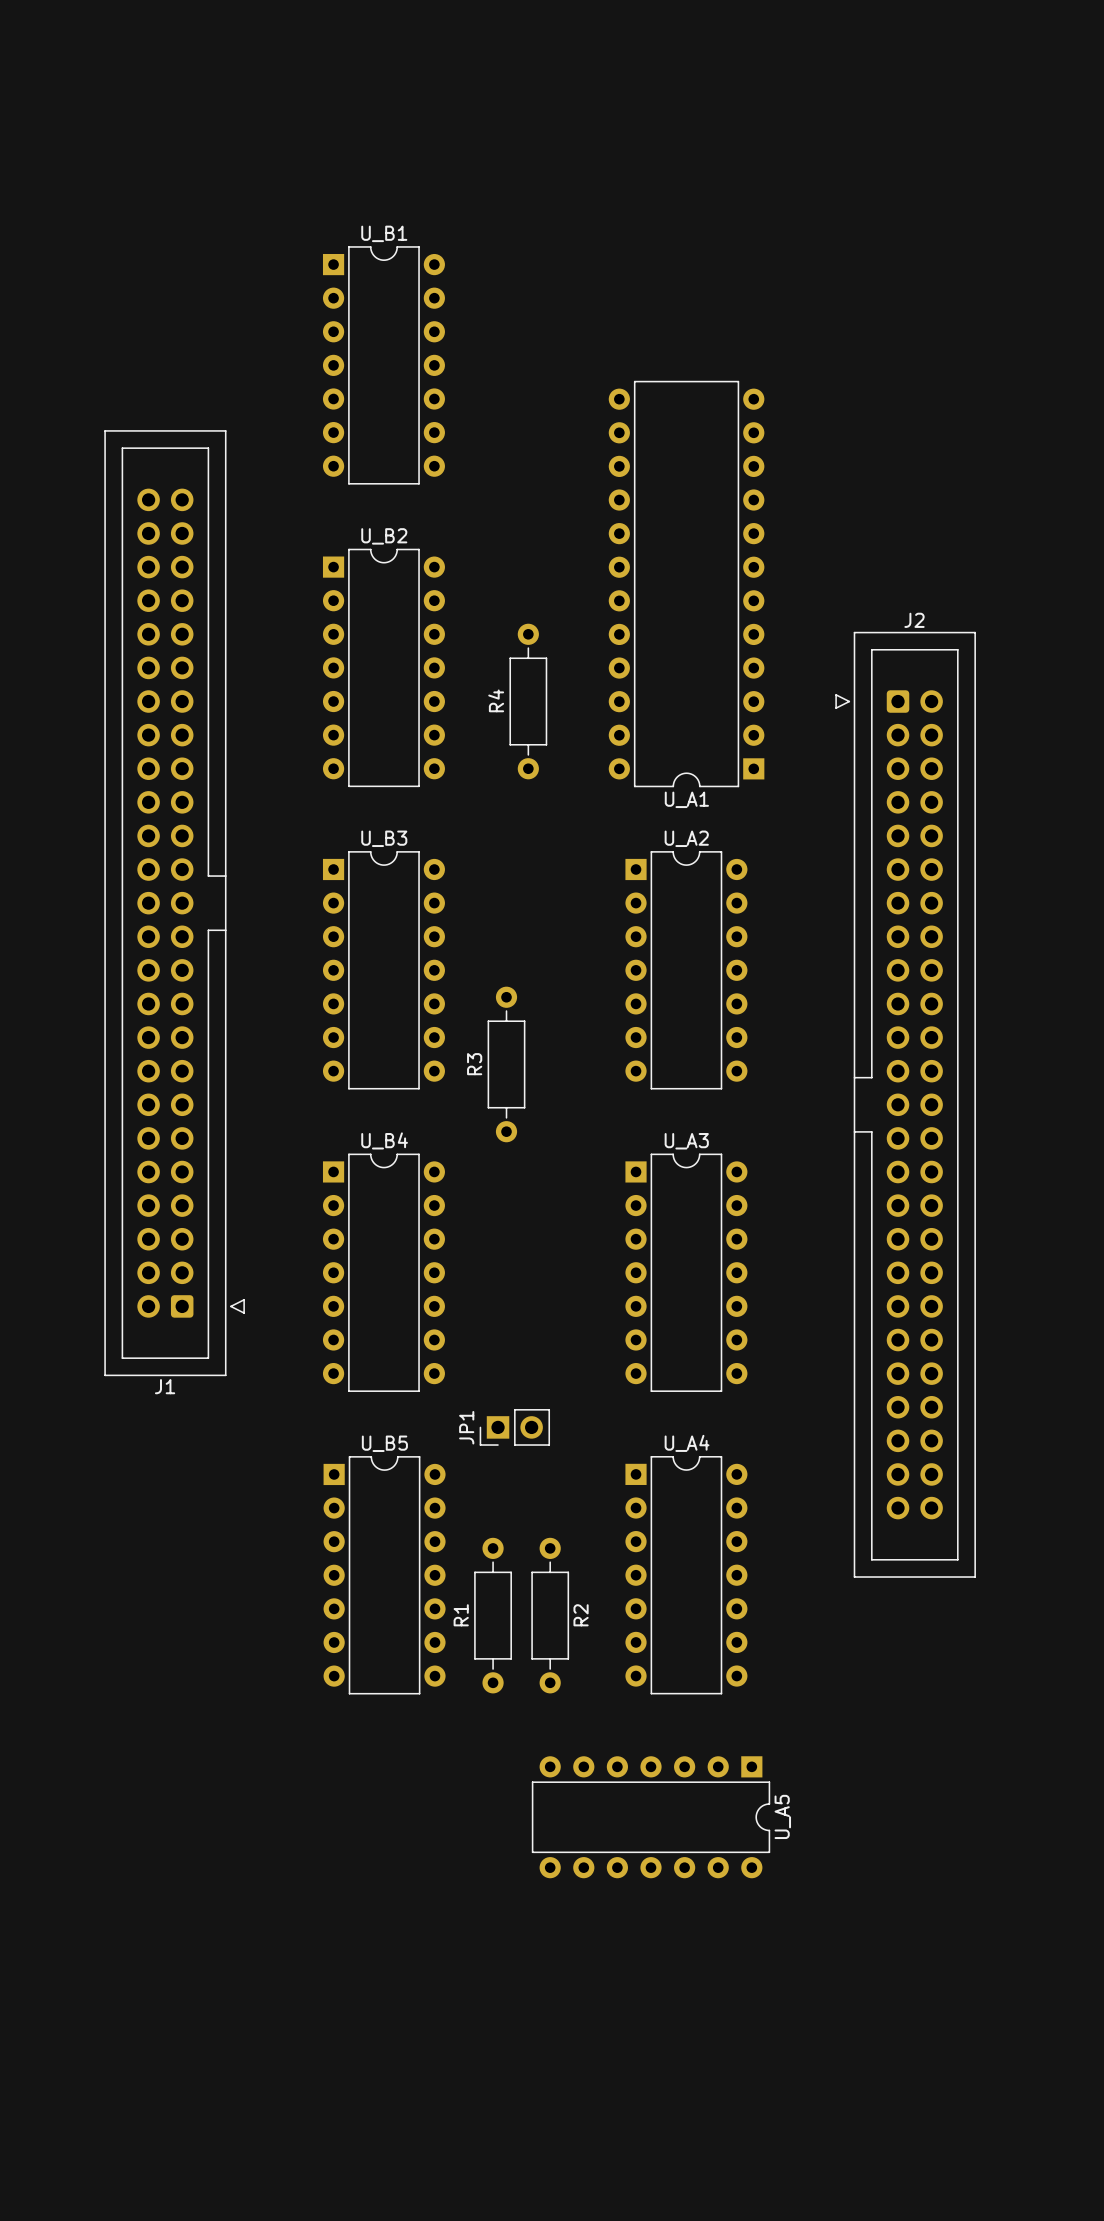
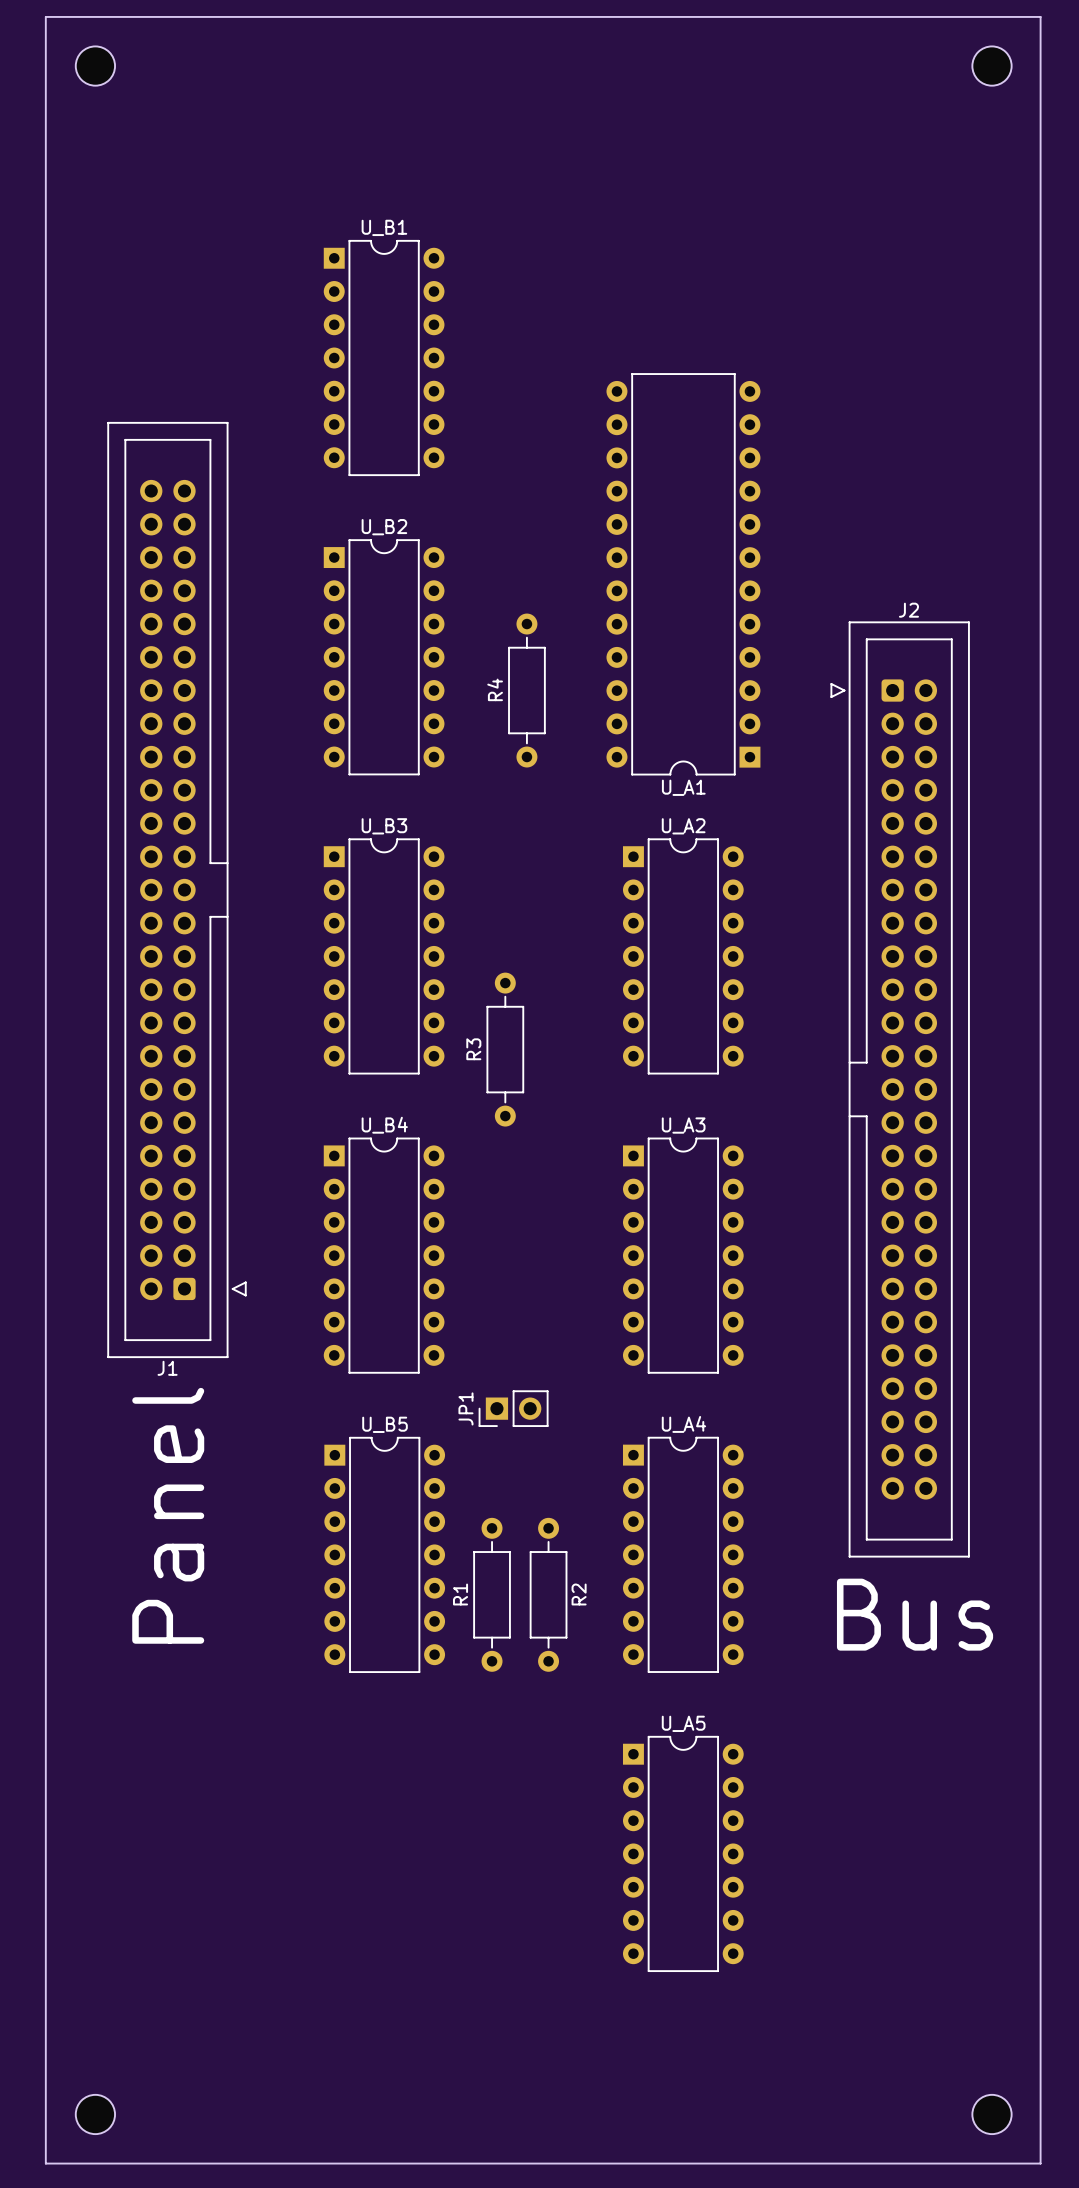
board edge: none -> (45, 16) (45, 2163) (1040, 2163) (1040, 16) (45, 16)
part: none -> (95, 66)
part: none -> (992, 66)
text: none -> Panel (168, 1515)
text: none -> Bus (915, 1614)
U_A5 rotation: 0° (651, 1817) -> 90° counterclockwise (683, 1853)
part: none -> (95, 2114)
part: none -> (992, 2114)

